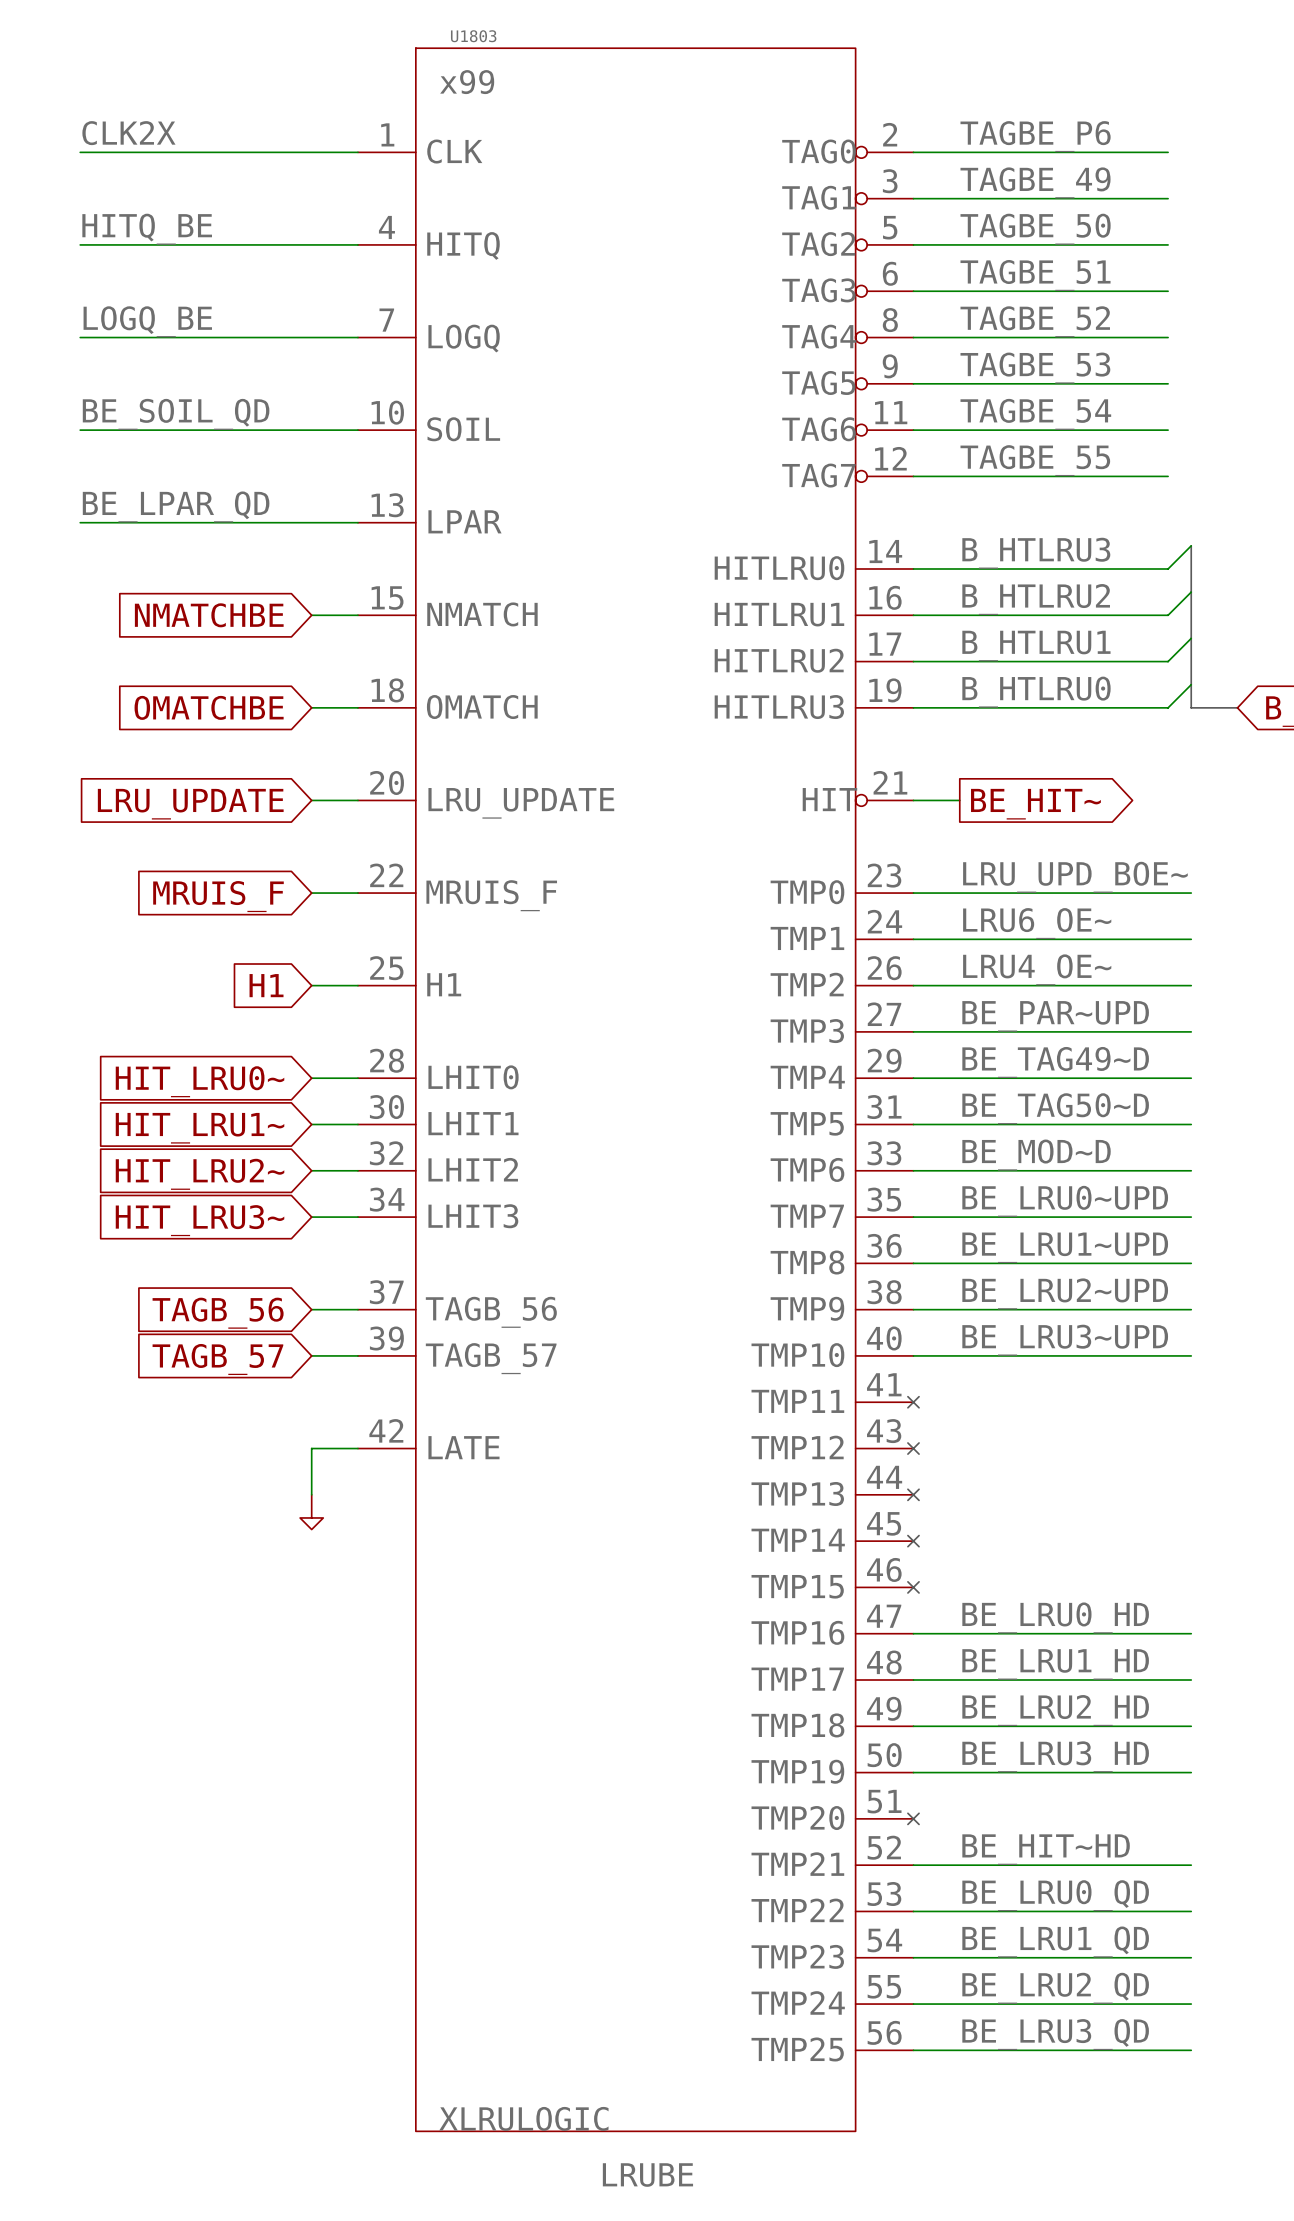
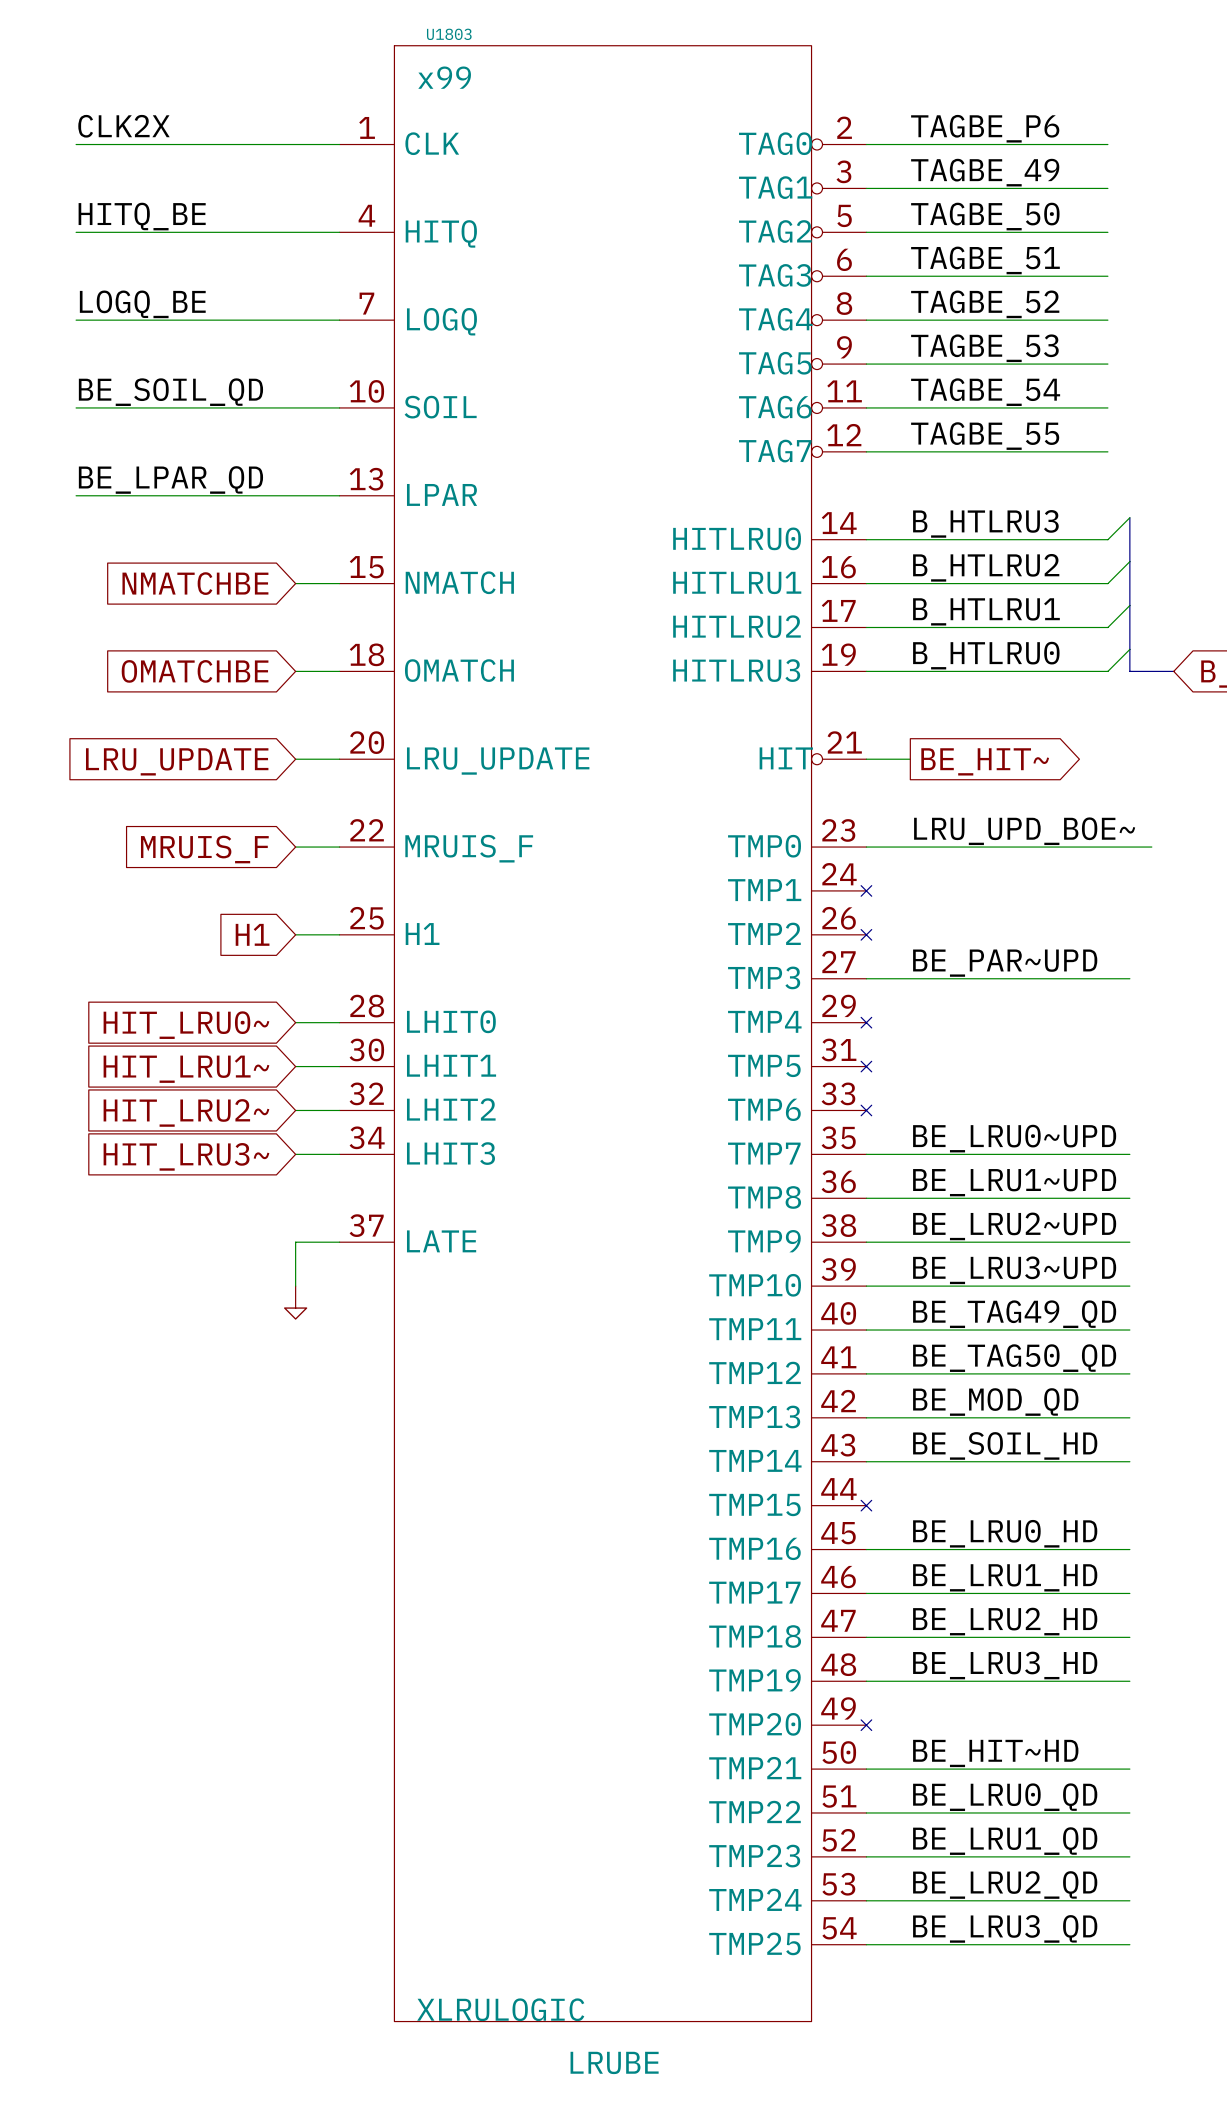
U1803 symbol: [357, 48, 914, 2132] -> [339, 45, 867, 2022]
wire: none -> (1129, 847) (1151, 847)
label: LRU6_OE~ (1037, 923) -> none
wire: (913, 939) (1191, 939) -> none
no-connect mark: none -> (866, 890)
label: LRU4_OE~ (1037, 969) -> none
wire: (913, 985) (1191, 985) -> none
no-connect mark: none -> (866, 934)
label: BE_TAG49~D (1055, 1062) -> none
wire: (913, 1078) (1191, 1078) -> none
no-connect mark: none -> (866, 1022)
label: BE_TAG50~D (1055, 1108) -> none
wire: (913, 1124) (1191, 1124) -> none
no-connect mark: none -> (866, 1066)
label: BE_MOD~D (1036, 1155) -> none
wire: (913, 1170) (1191, 1170) -> none
no-connect mark: none -> (866, 1110)
global label: TAGB_56 (218, 1313) -> none
wire: (311, 1355) (357, 1355) -> (295, 1286) (295, 1242)
global label: TAGB_57 (217, 1359) -> none
label: none -> BE_TAG49_QD (1014, 1314)
wire: none -> (866, 1330) (1129, 1330)
no-connect mark: (913, 1402) -> none
label: none -> BE_TAG50_QD (1014, 1358)
wire: (357, 1448) (311, 1448) (311, 1494) -> none
wire: none -> (866, 1373) (1129, 1373)
no-connect mark: (913, 1448) -> none
label: none -> BE_MOD_QD (995, 1402)
wire: none -> (866, 1417) (1129, 1417)
no-connect mark: (913, 1494) -> none
power symbol position: (311, 1512) -> (295, 1302)
label: none -> BE_SOIL_HD (1005, 1445)
wire: none -> (866, 1461) (1129, 1461)
no-connect mark: (913, 1541) -> none

